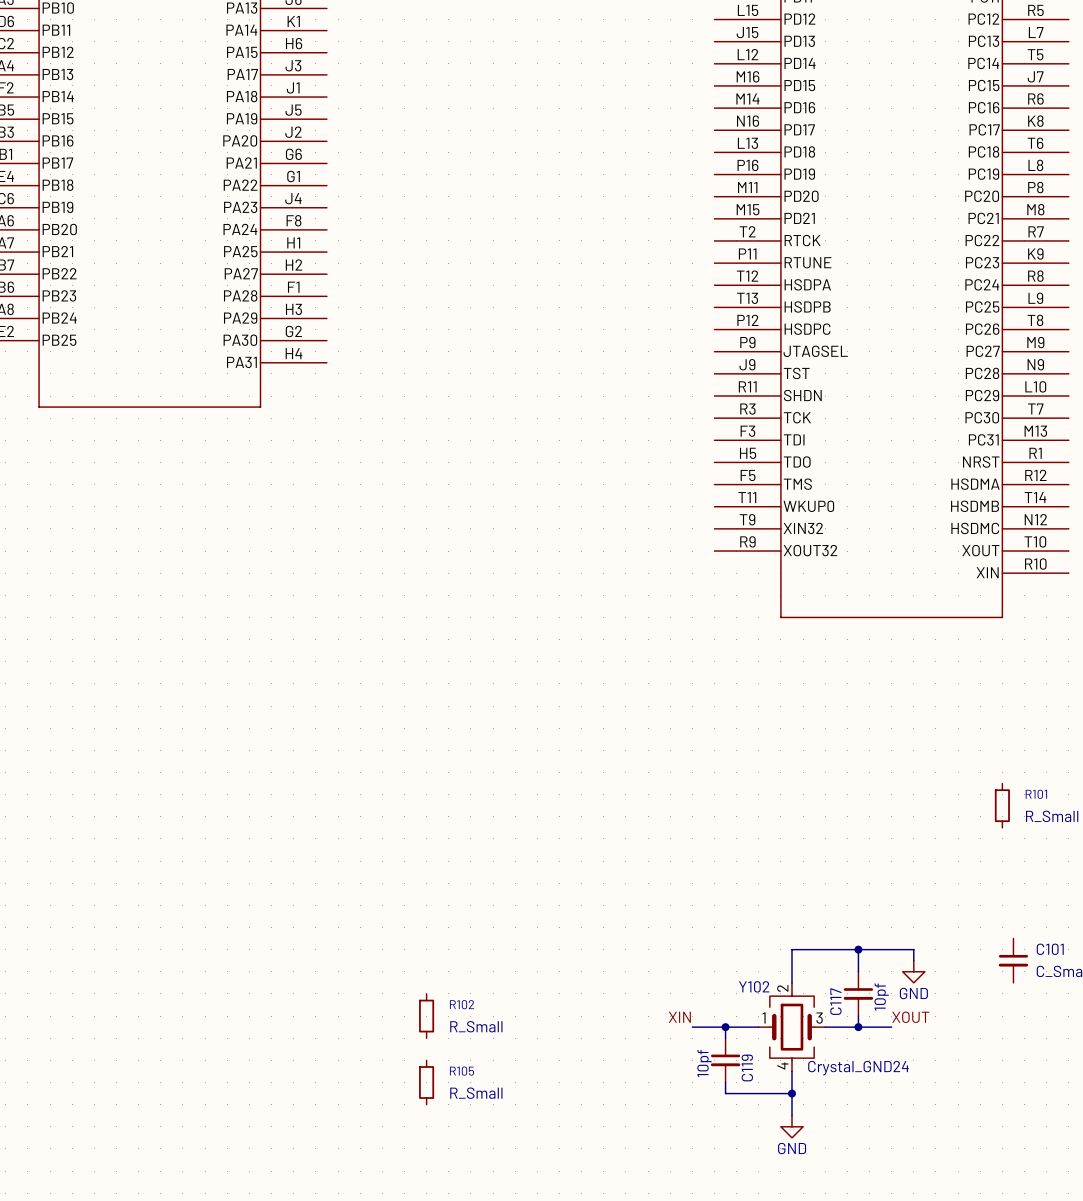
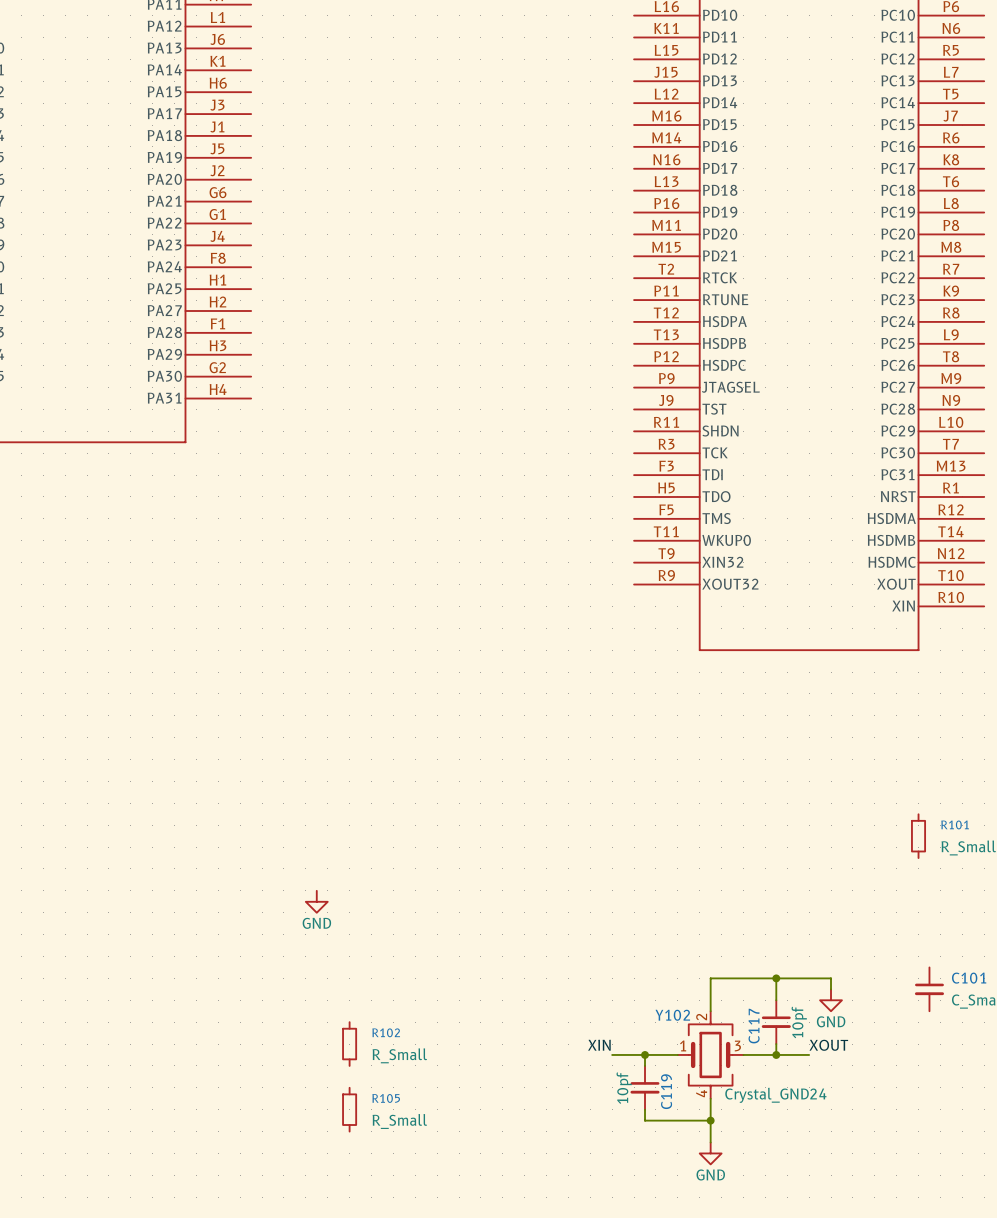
power symbol: none -> GND (316, 901)

